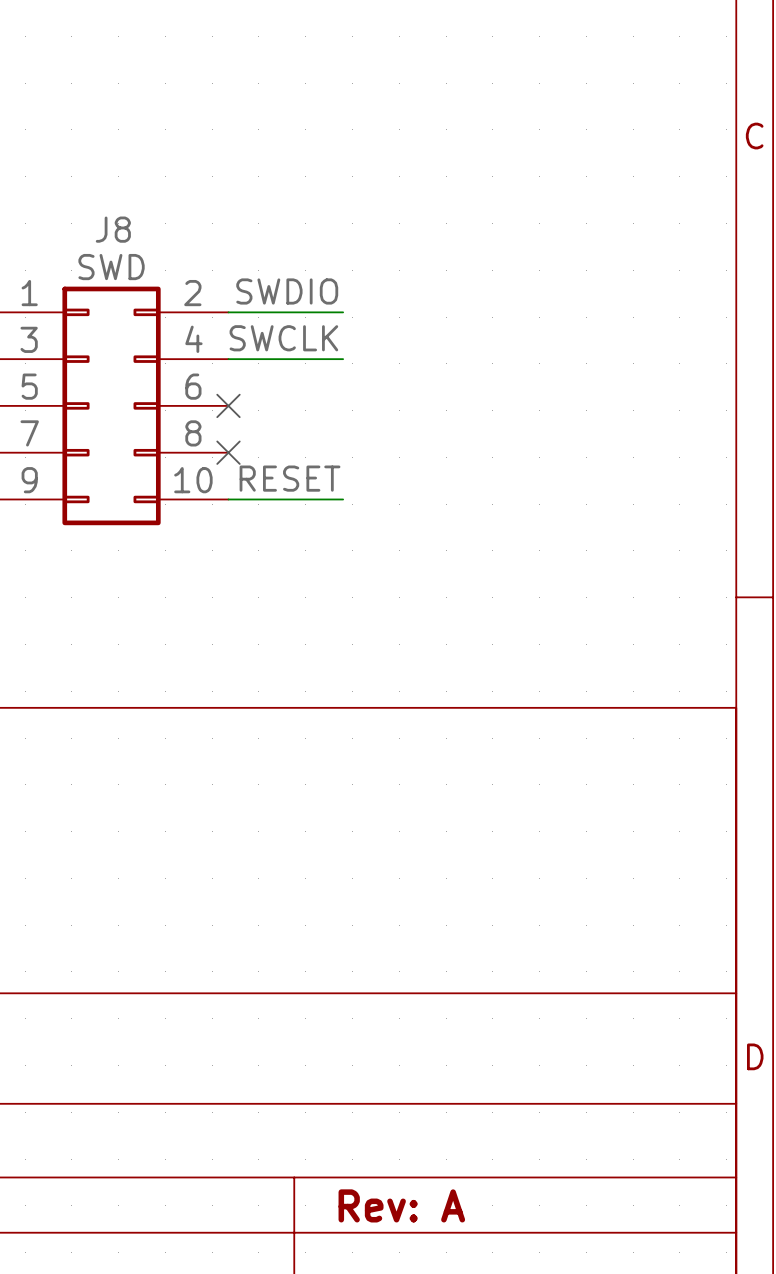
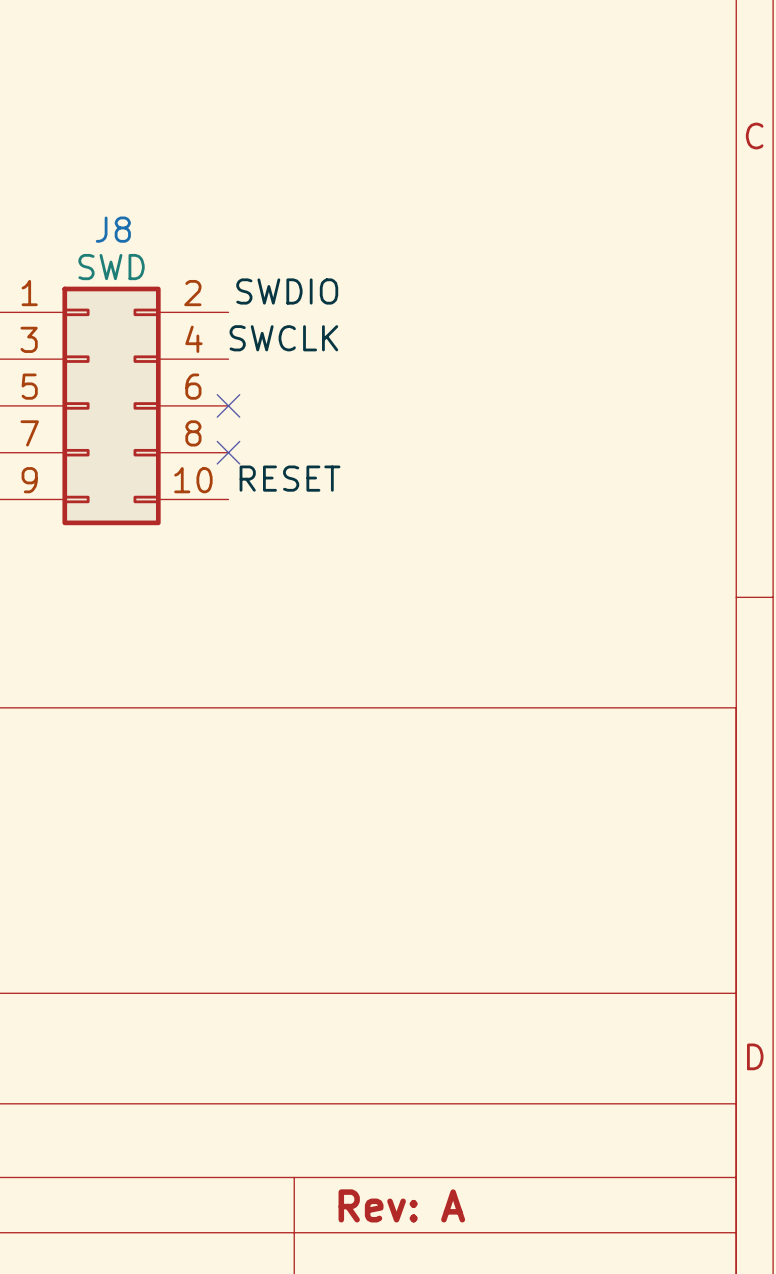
wire: (228, 312) (343, 312) -> none
wire: (228, 359) (343, 359) -> none
wire: (228, 499) (343, 499) -> none

